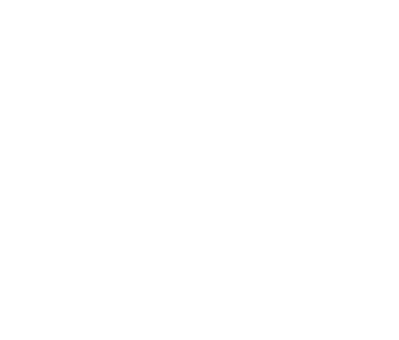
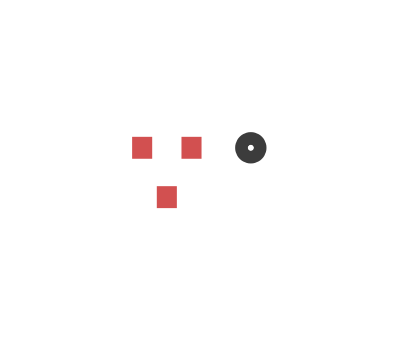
part: none -> (199, 170)

